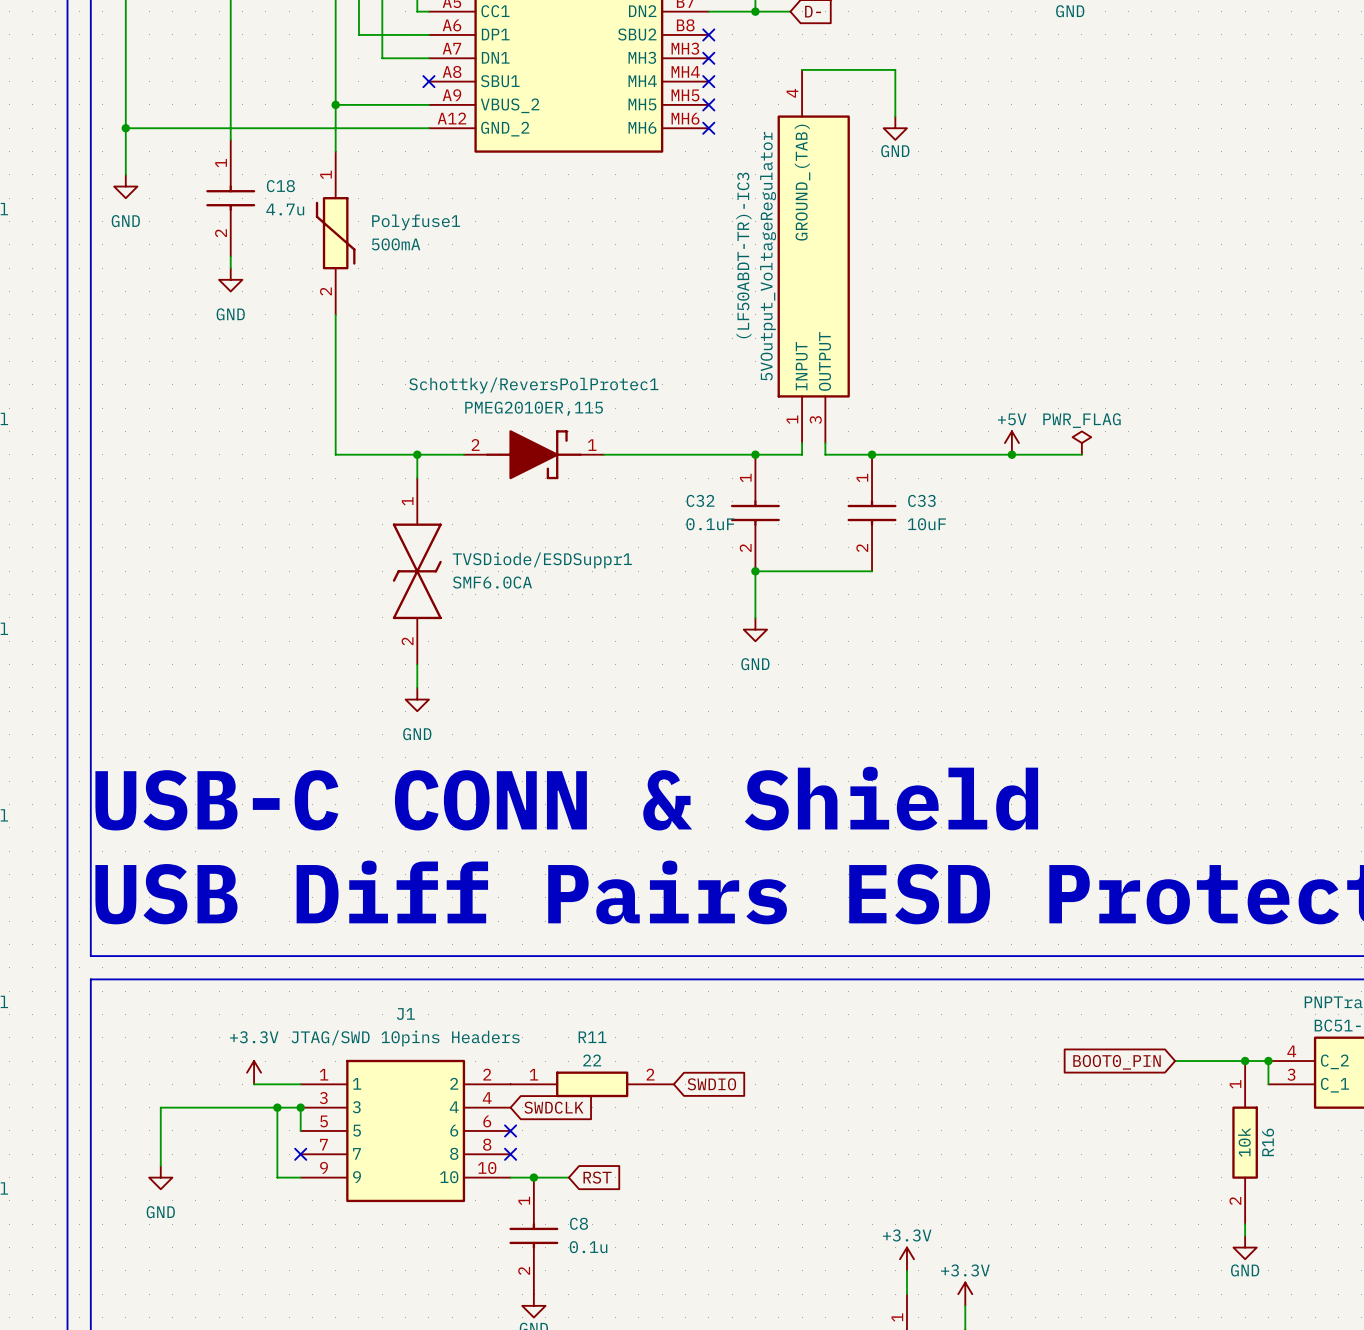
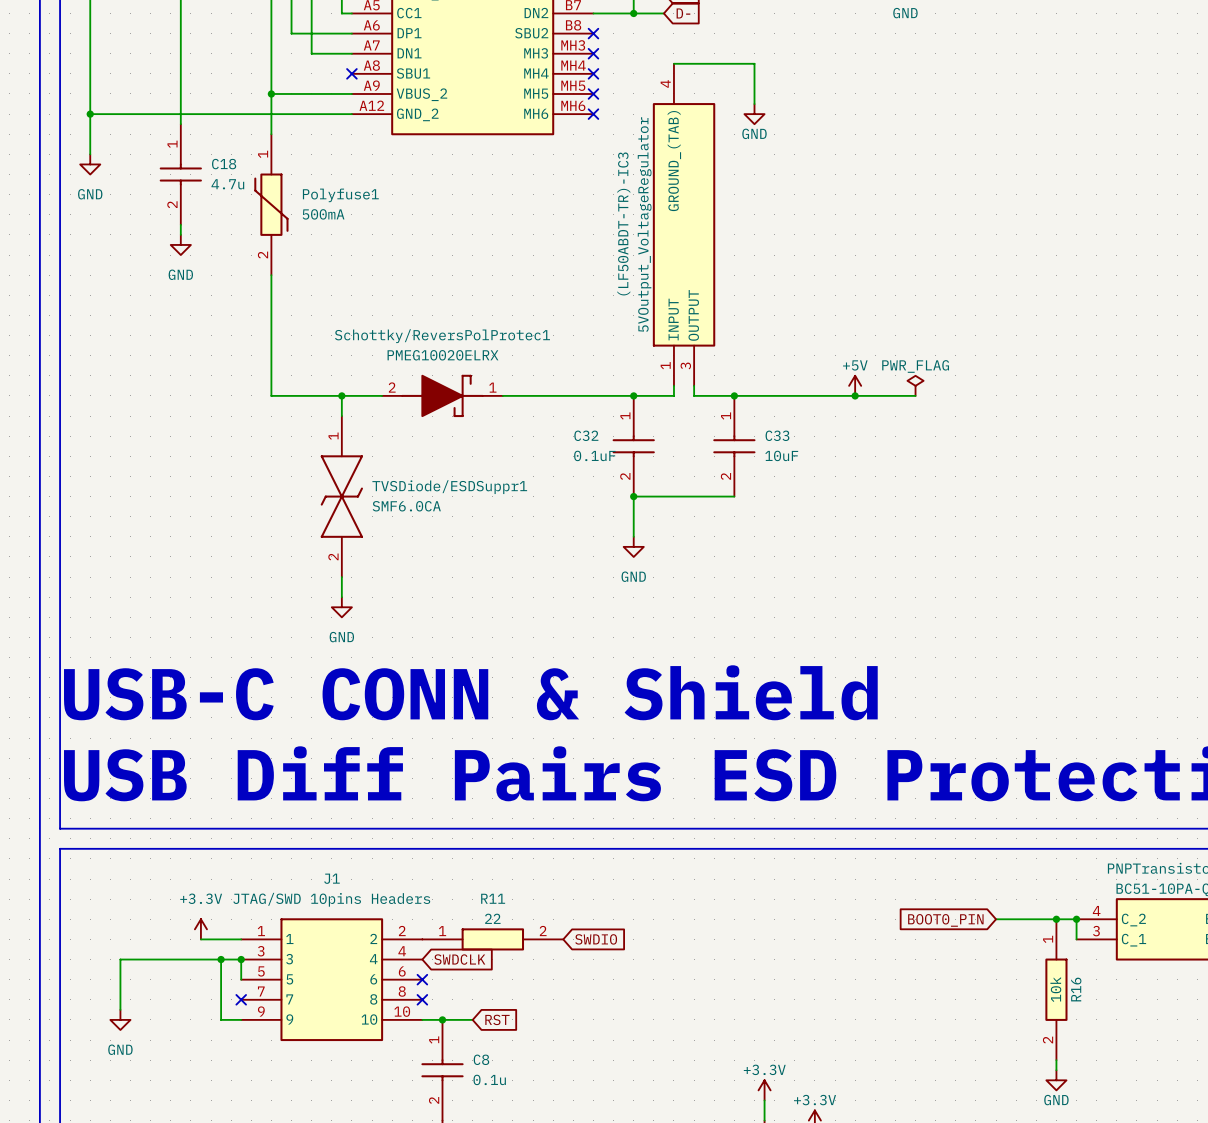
Schottky/ReversPolProtec1 value: PMEG2010ER,115 (534, 408) -> PMEG10020ELRX (442, 355)

